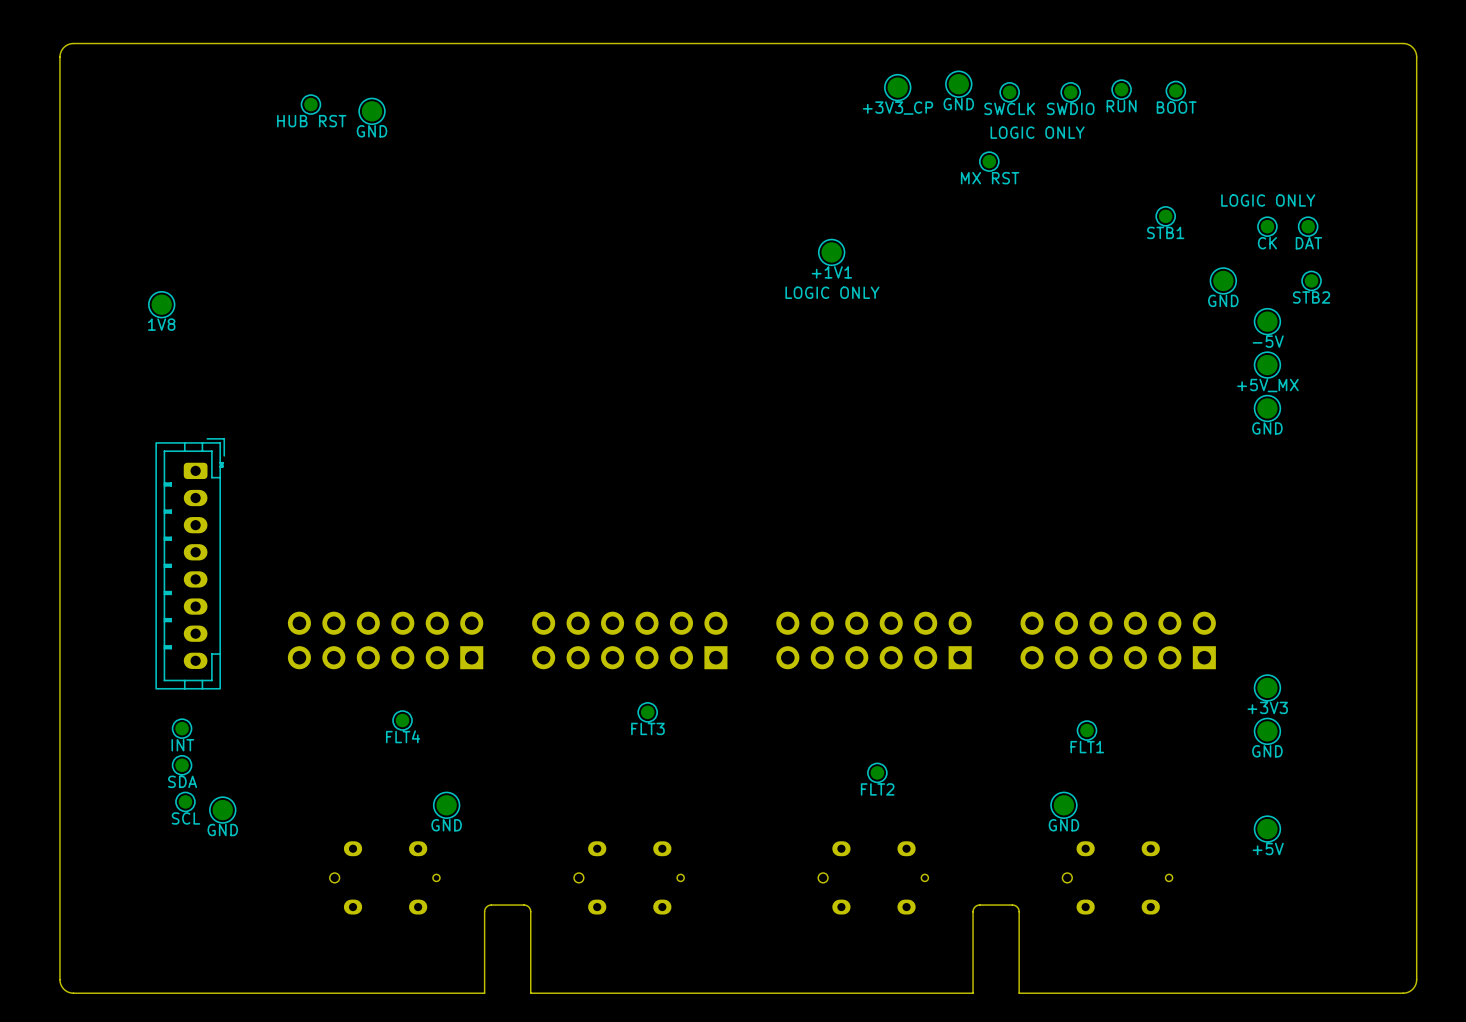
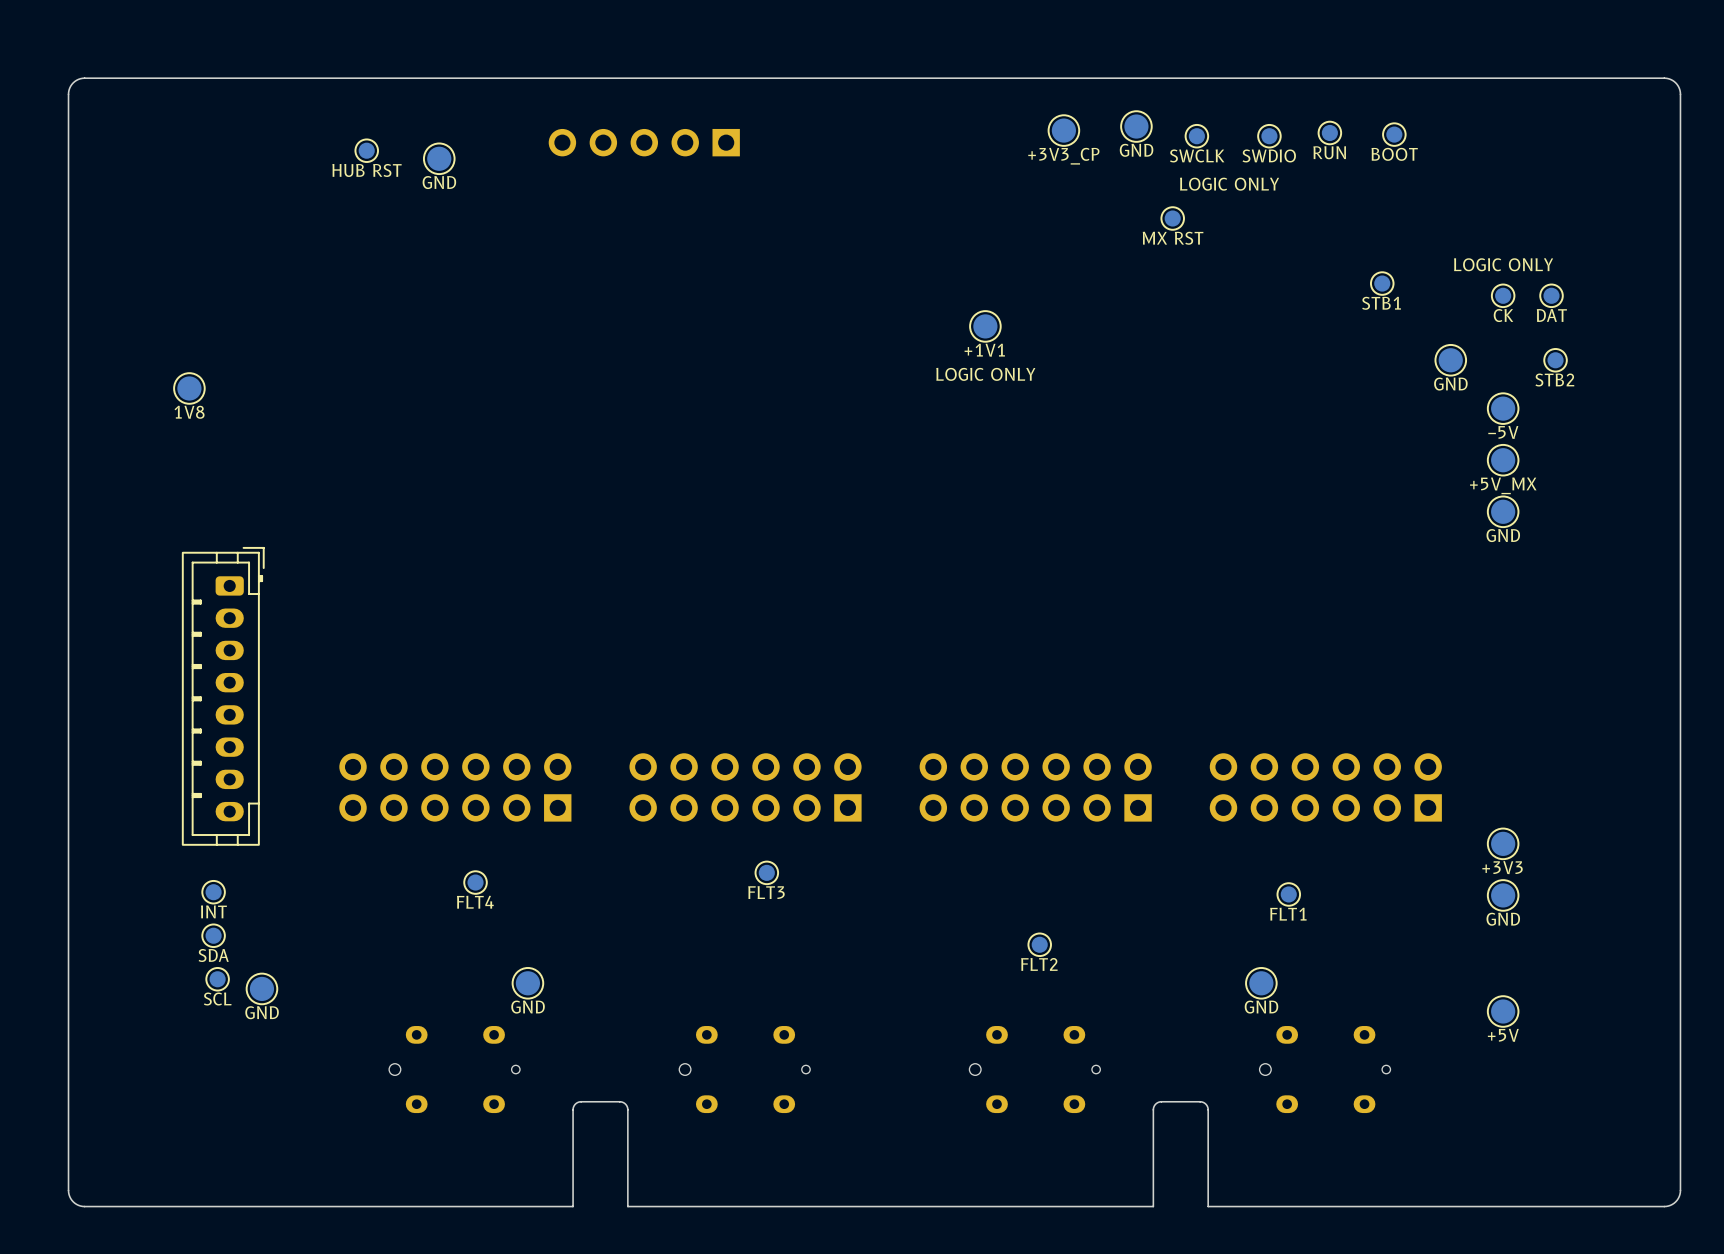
part: none -> (644, 142)

